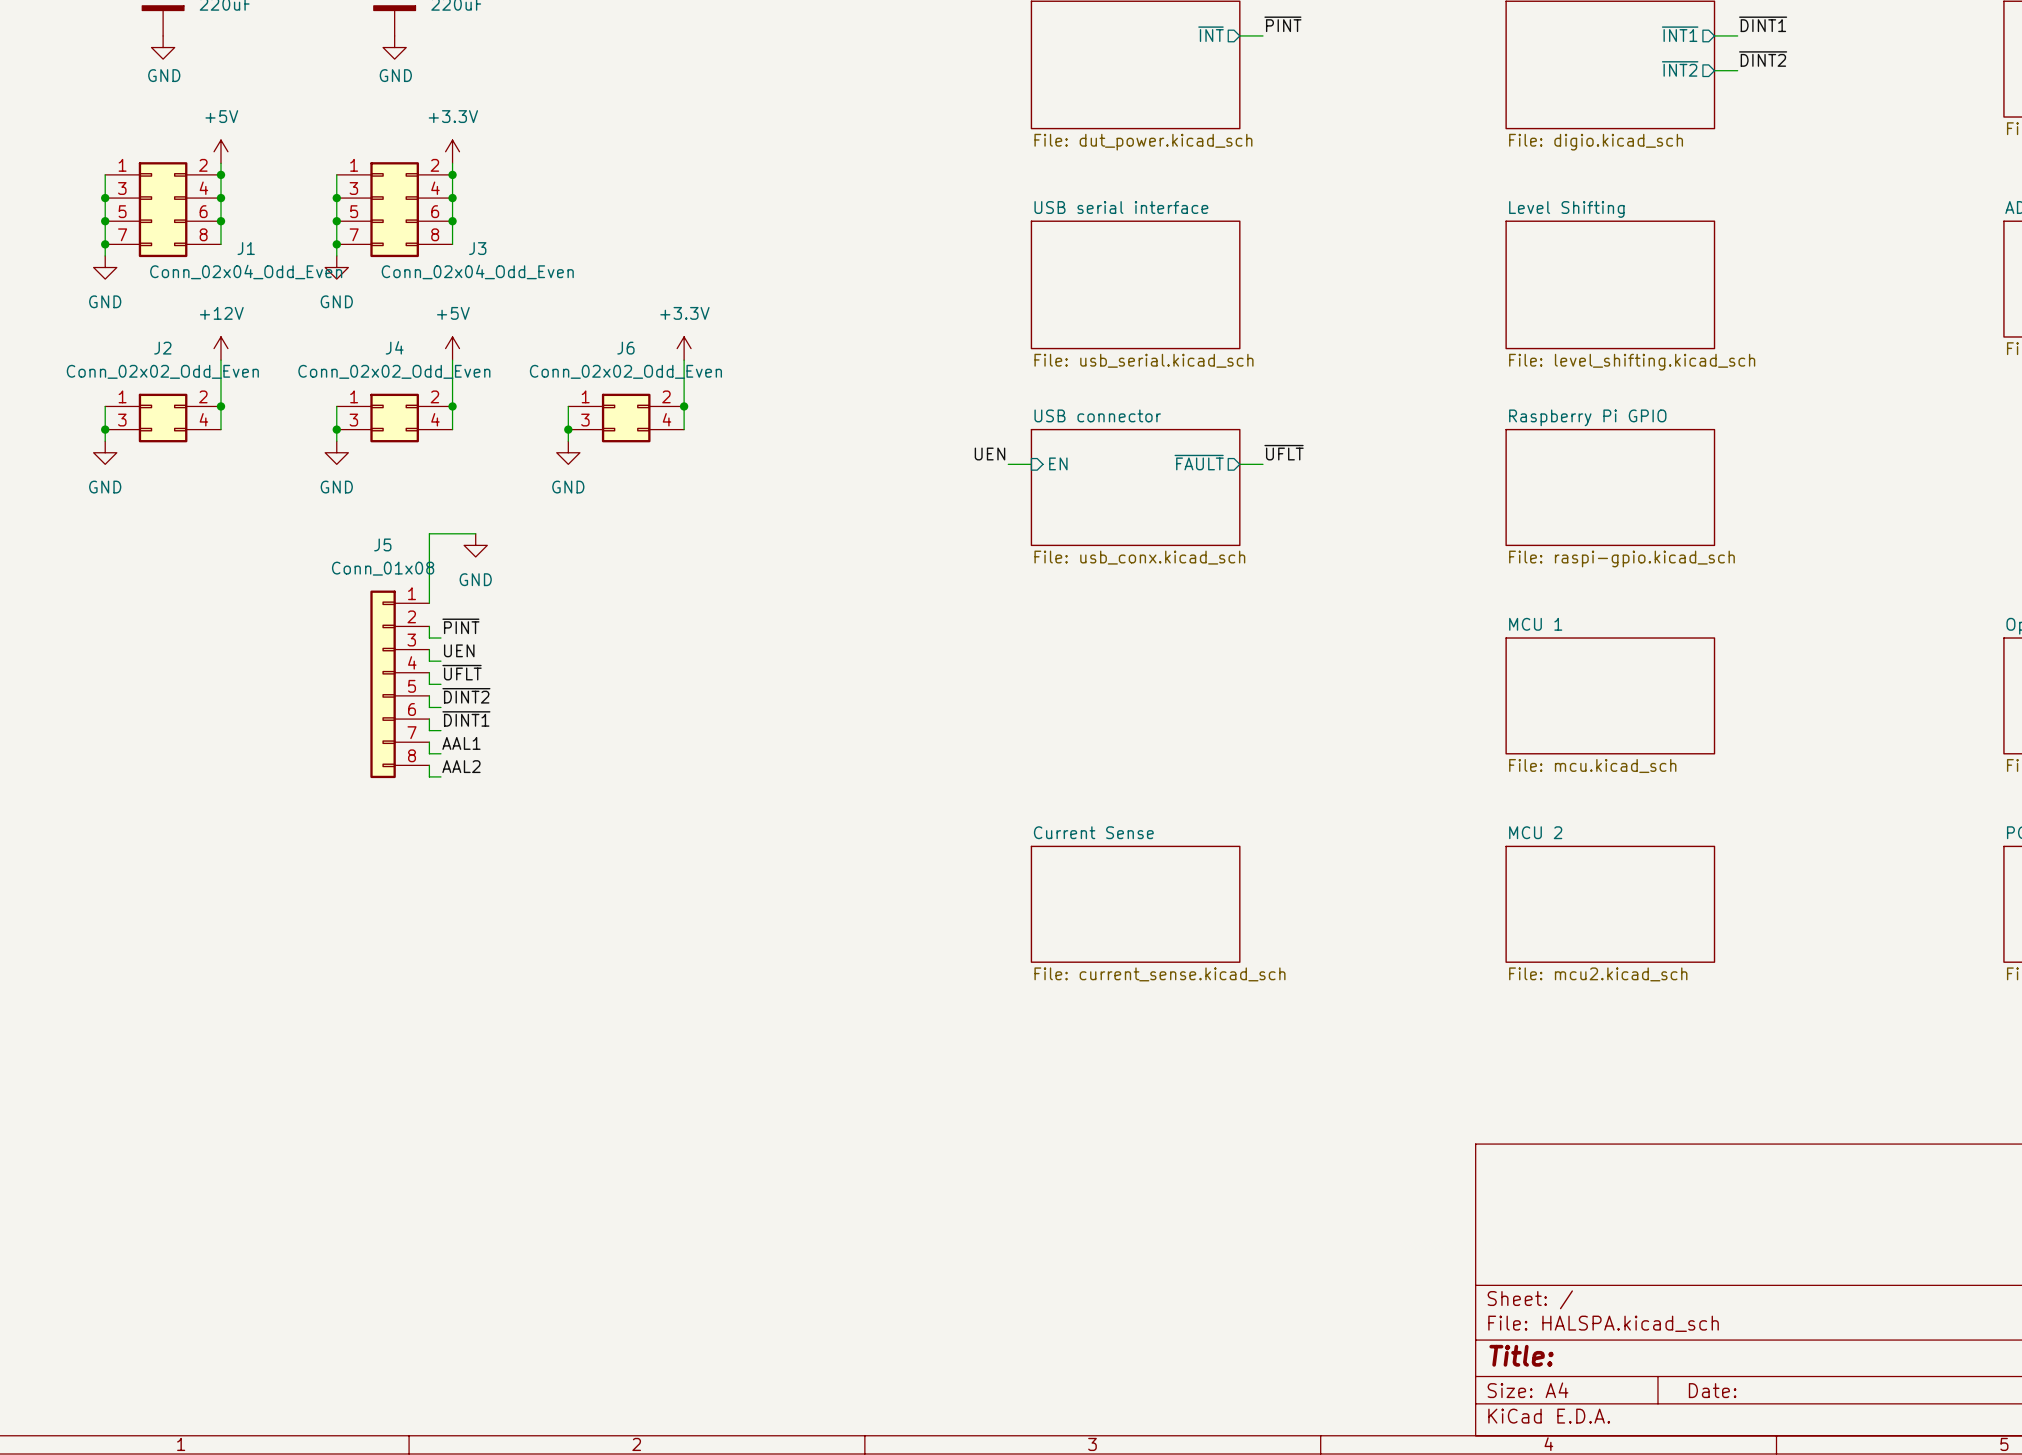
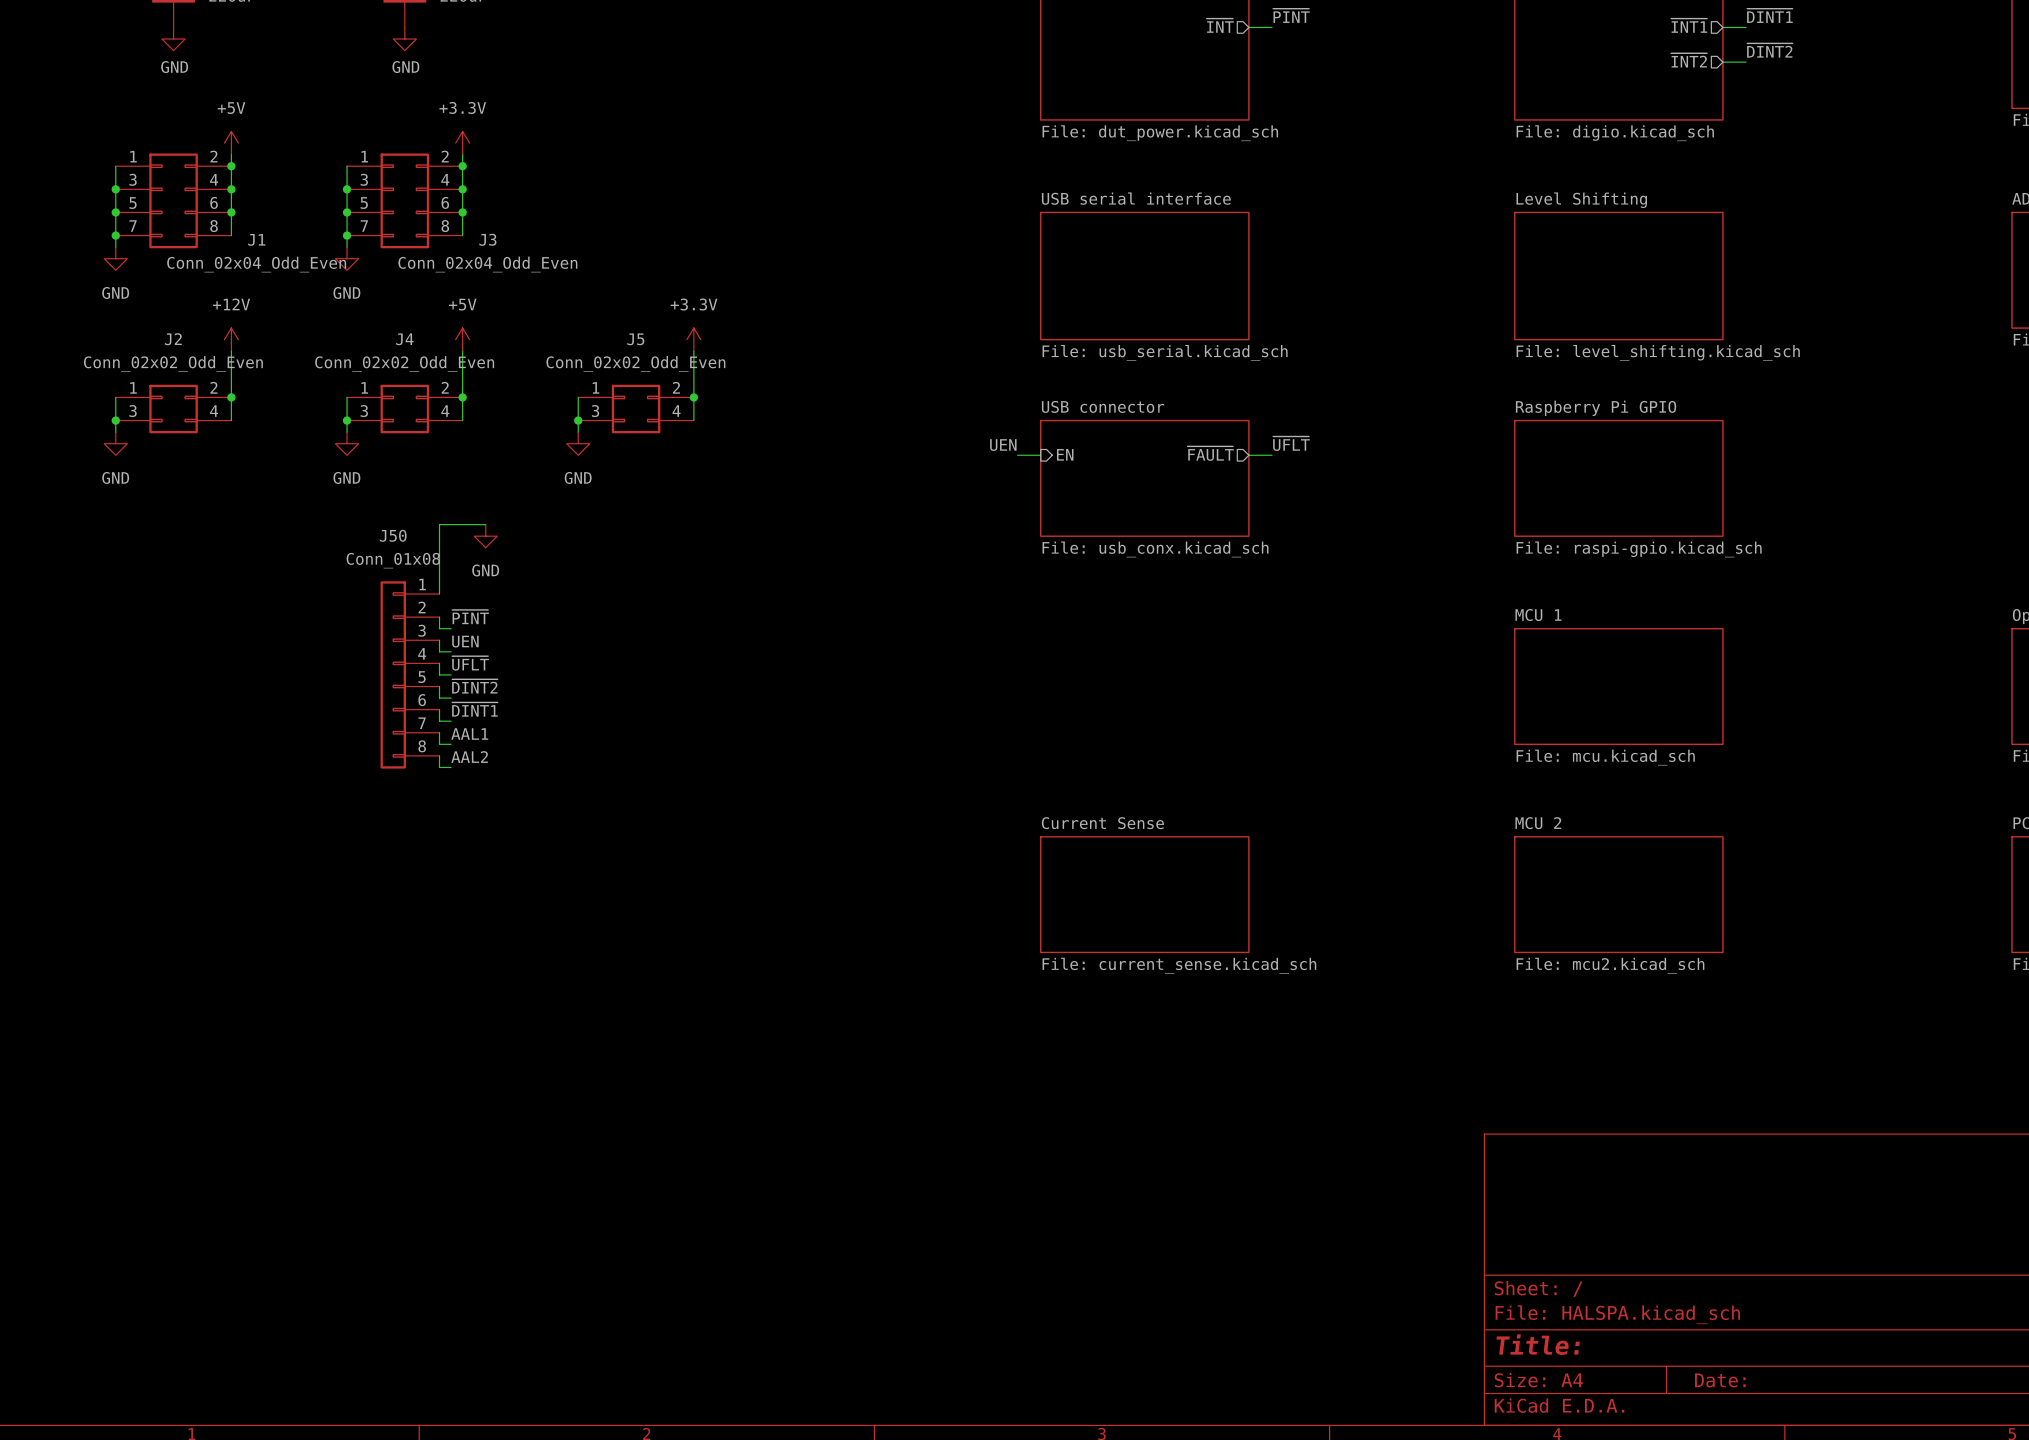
J6 name: J6 (625, 348) -> J5 (635, 339)
J5 name: J5 (382, 544) -> J50 (393, 535)

